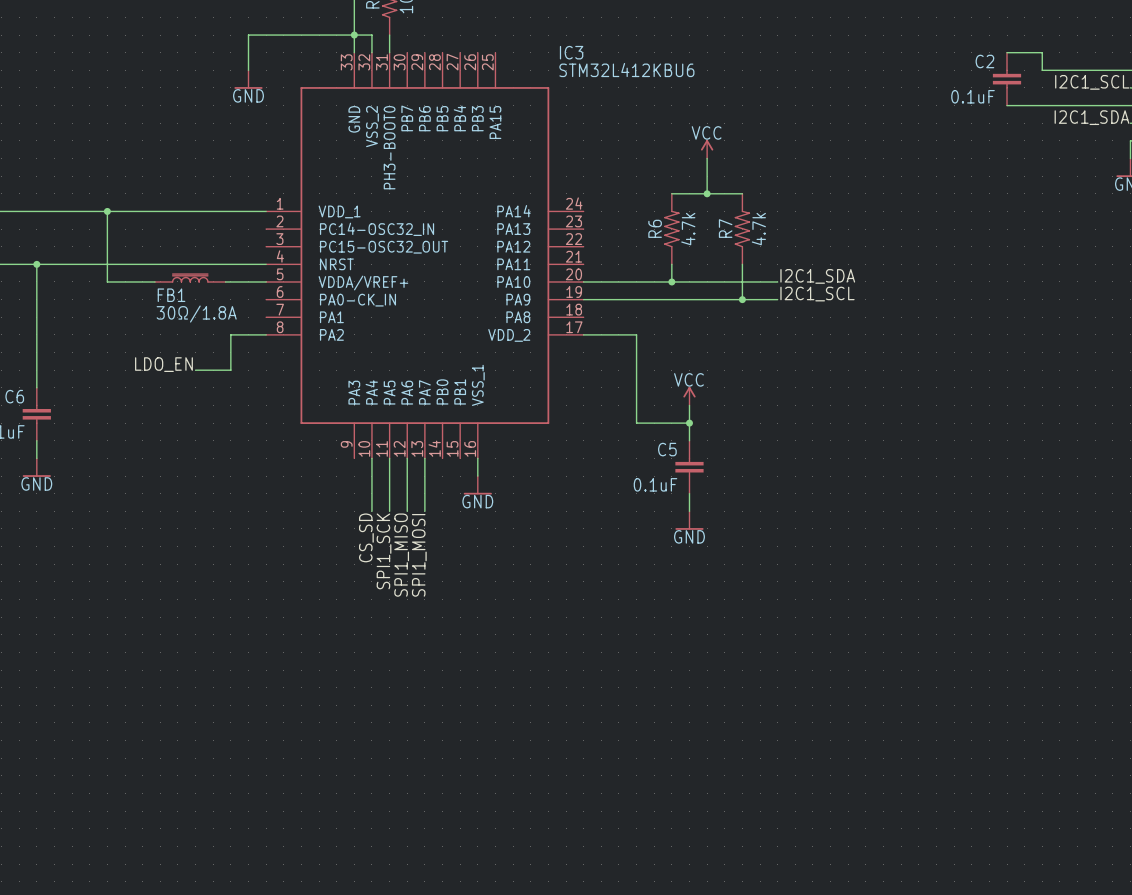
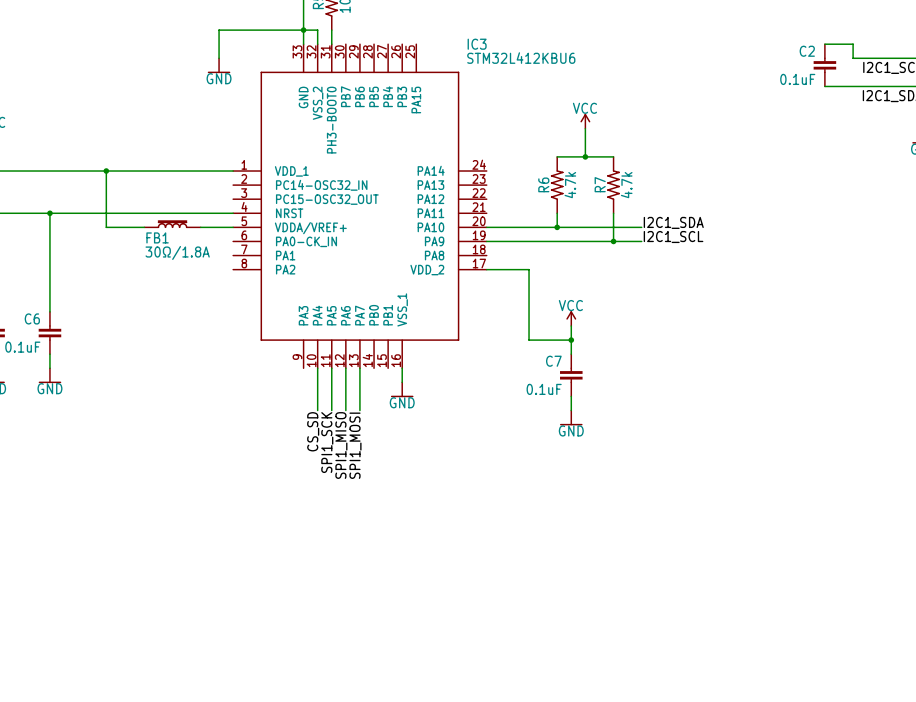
wire: (266, 334) (230, 334) (230, 370) (195, 370) -> none
label: LDO_EN (163, 364) -> none
C5 name: C5 (667, 449) -> C7 (553, 361)

